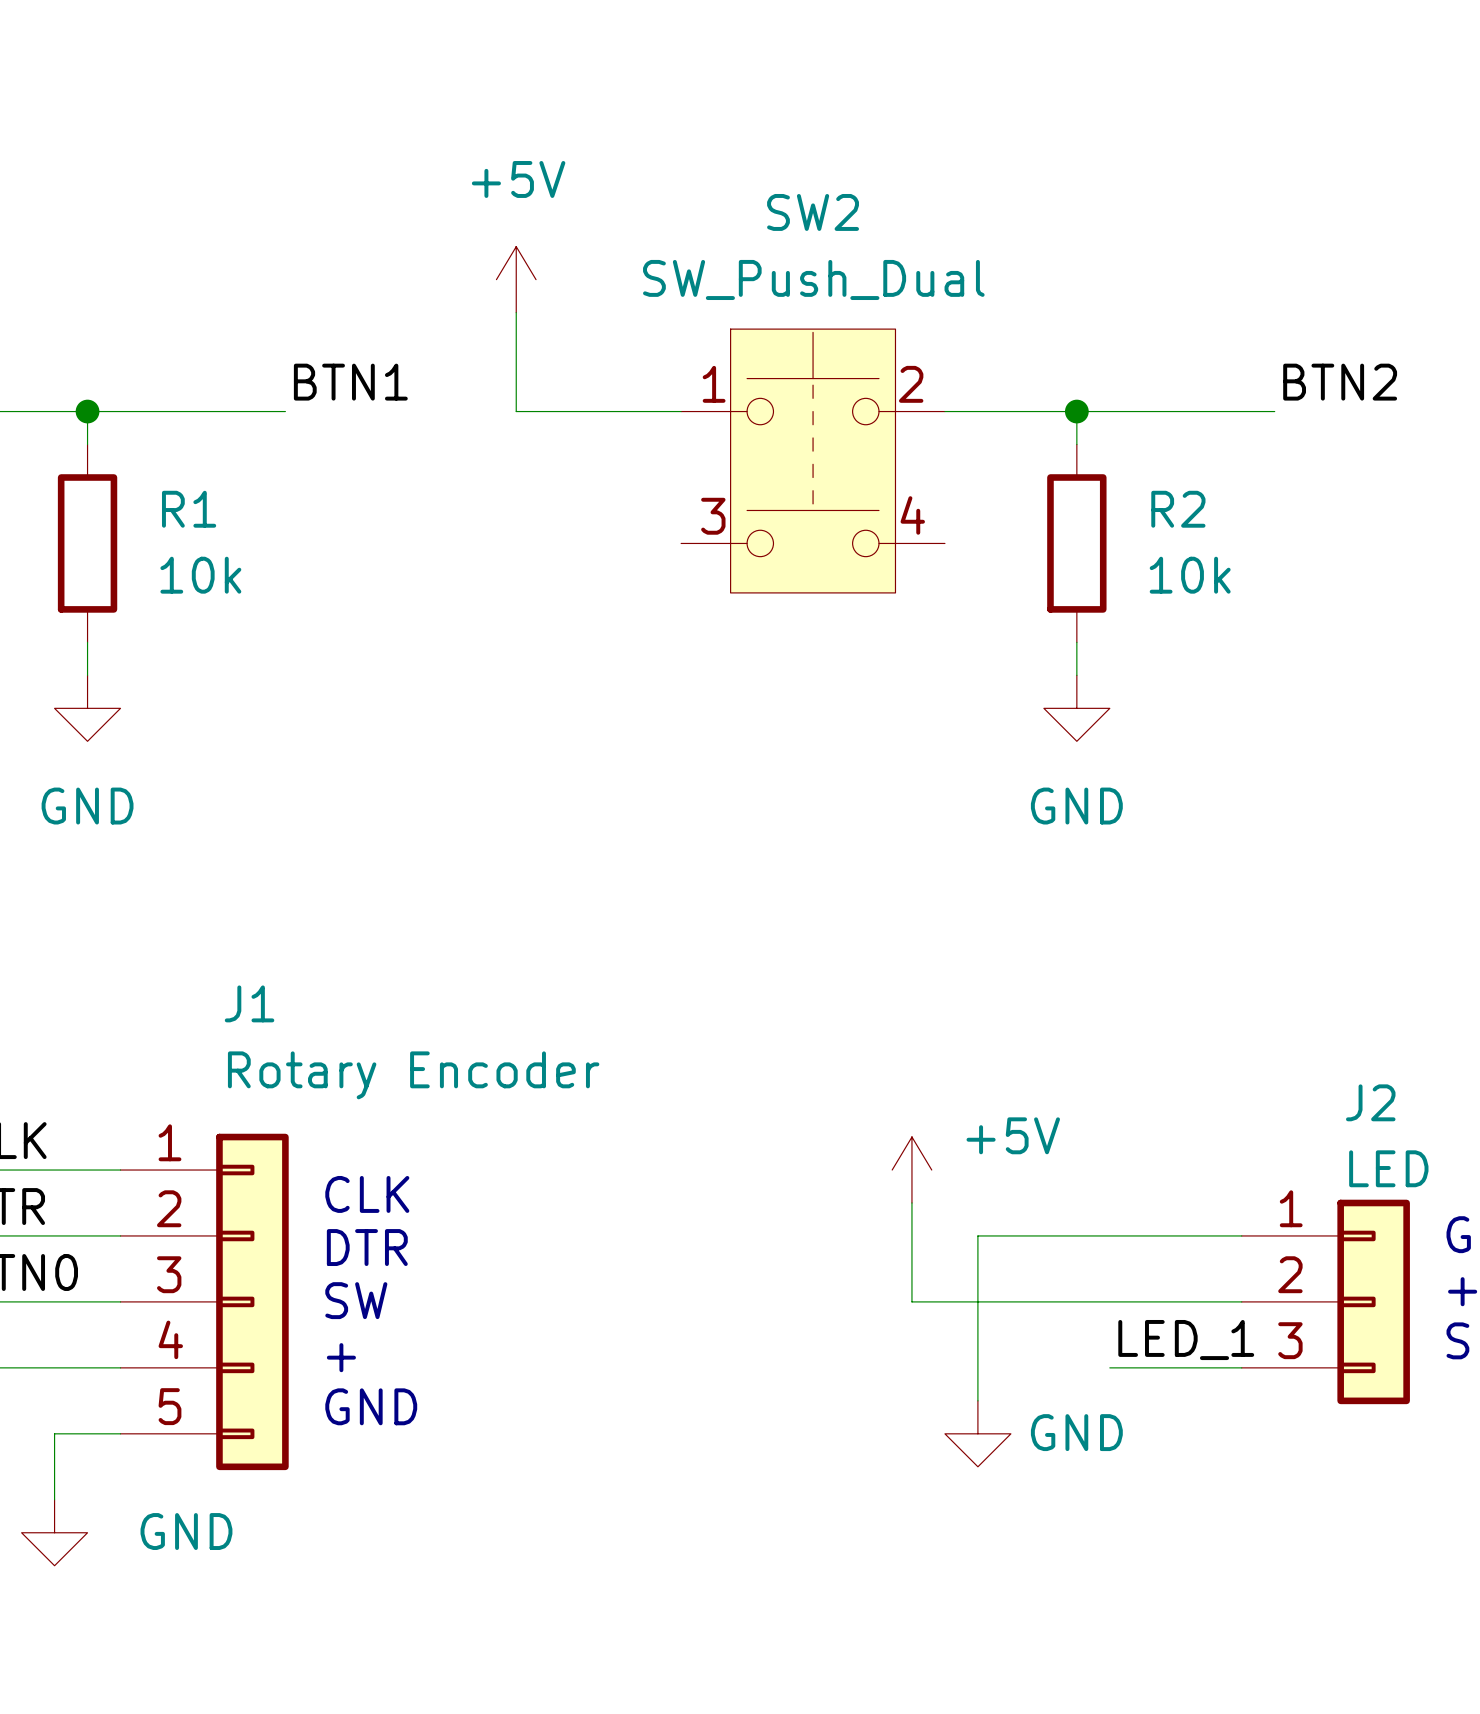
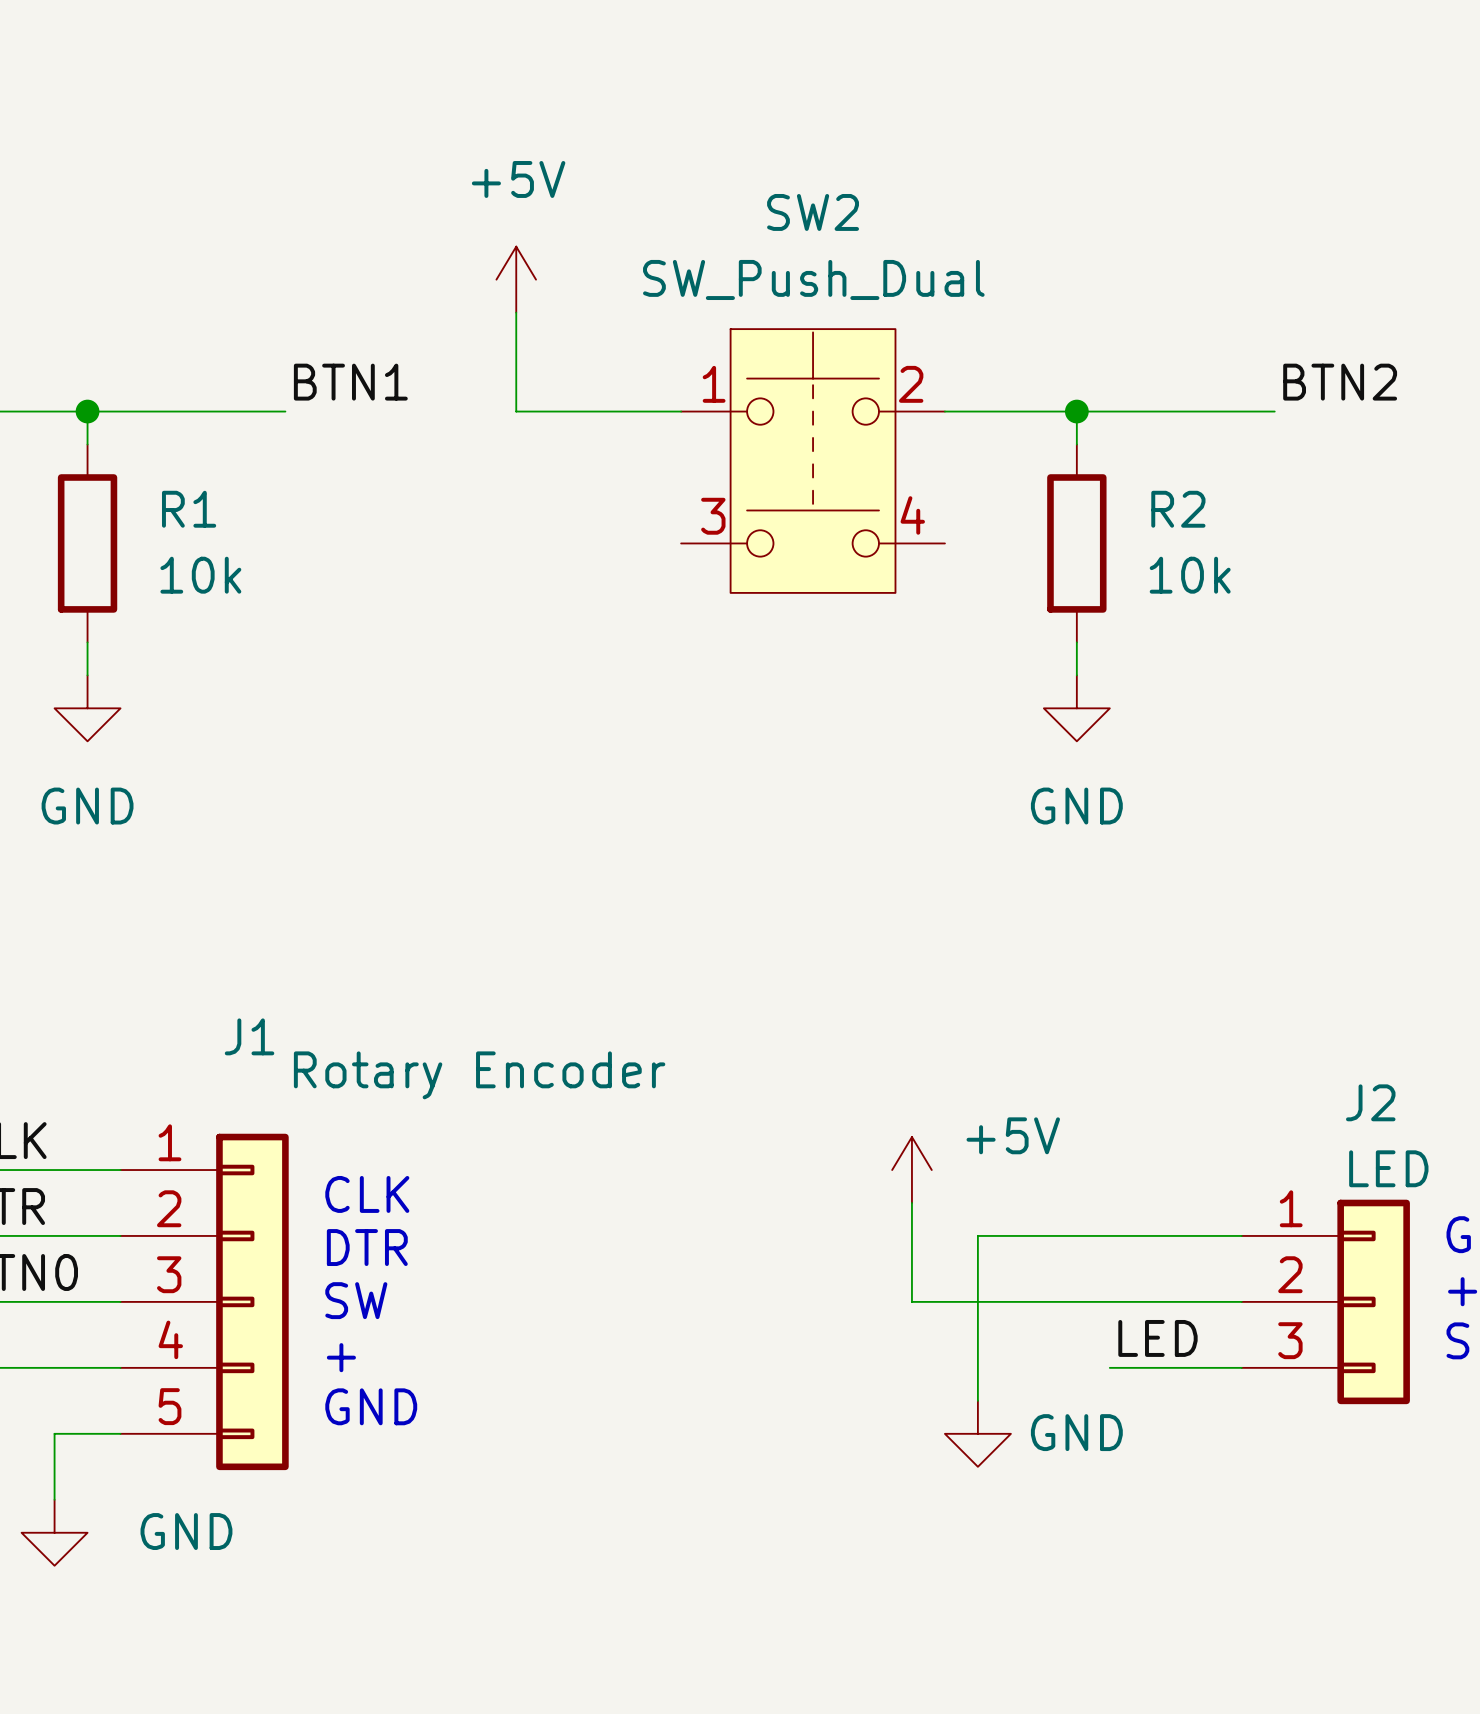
J1 name position: J1 (249, 1003) -> J1 (249, 1036)
J1 value position: Rotary Encoder (413, 1075) -> Rotary Encoder (479, 1075)
label: LED_1 (1186, 1340) -> LED (1157, 1338)

